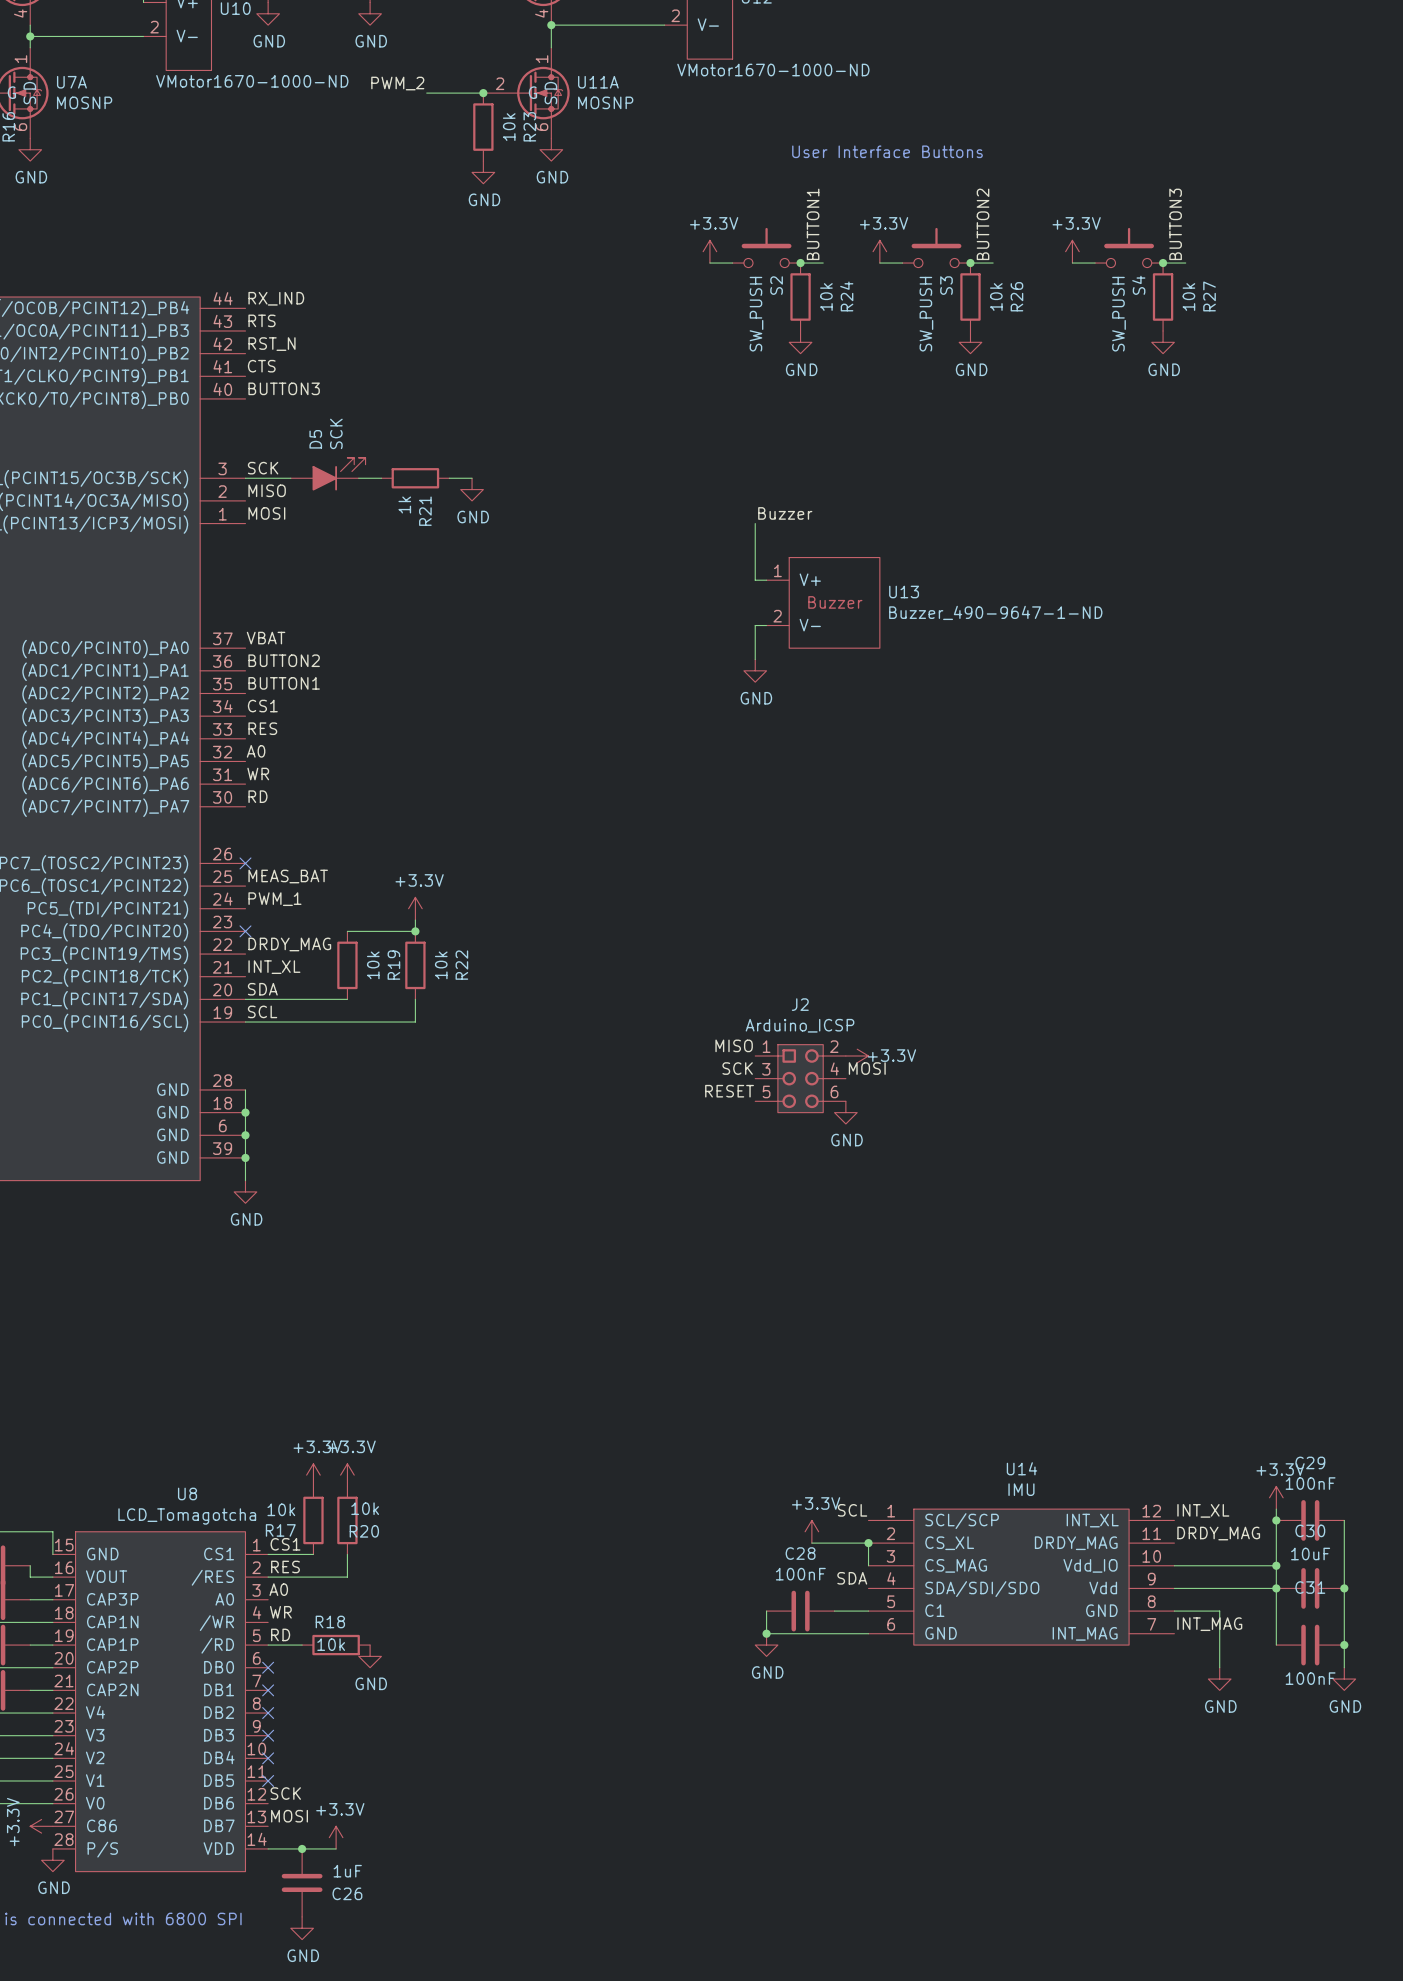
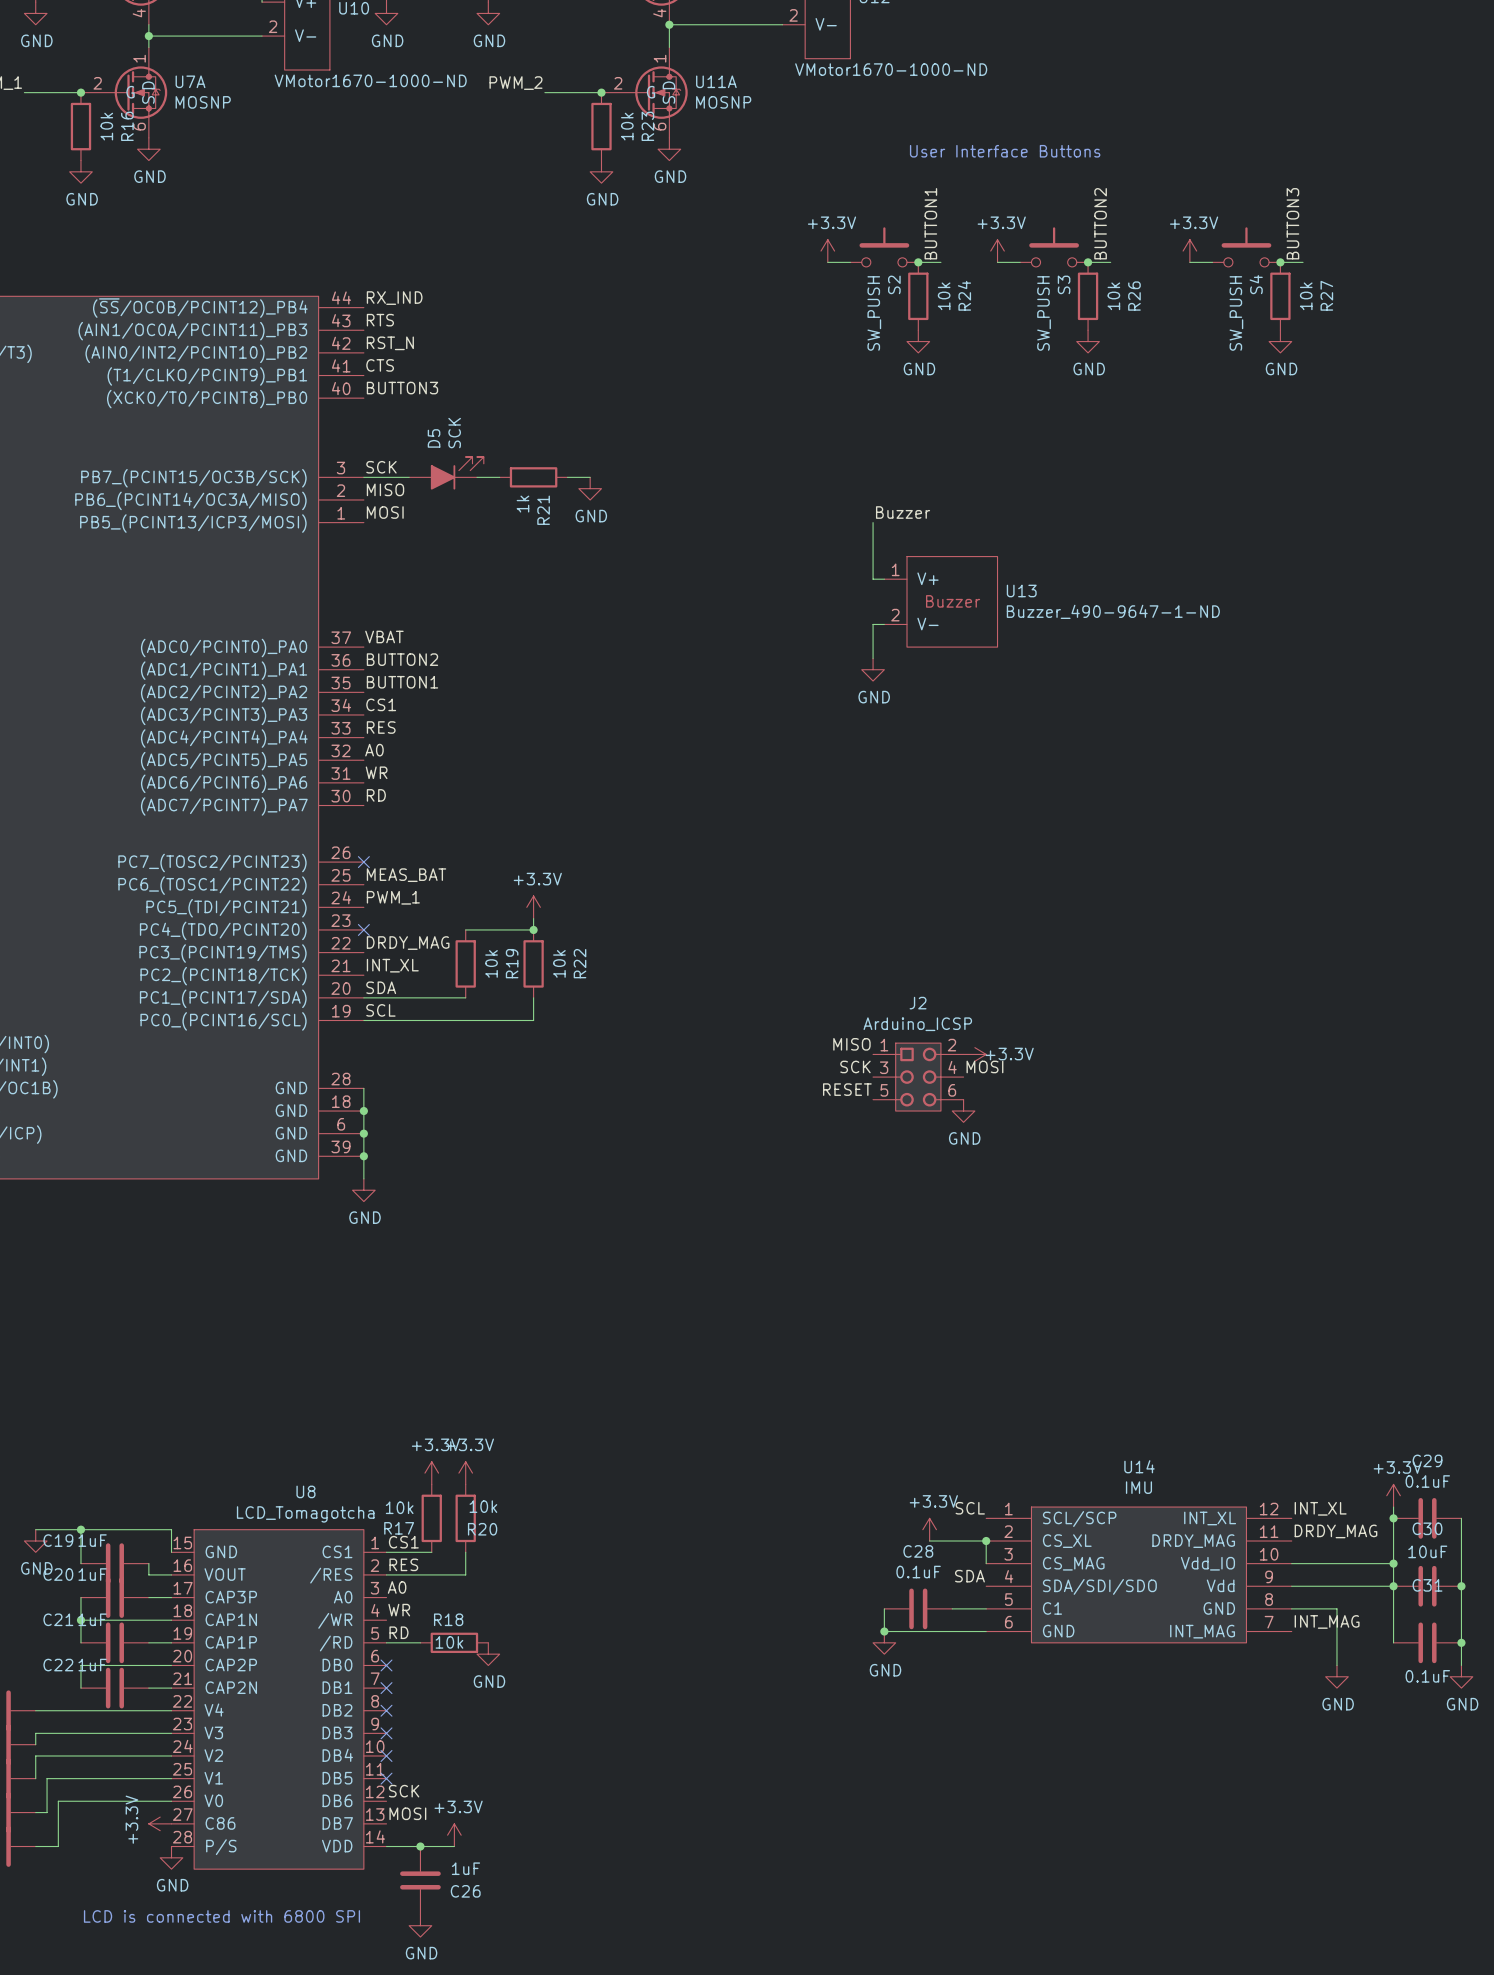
C29 value: 100nF (1310, 1483) -> 0.1uF (1427, 1481)
C28 value: 100nF (800, 1574) -> 0.1uF (918, 1572)
C31 value: 100nF (1310, 1678) -> 0.1uF (1427, 1676)

